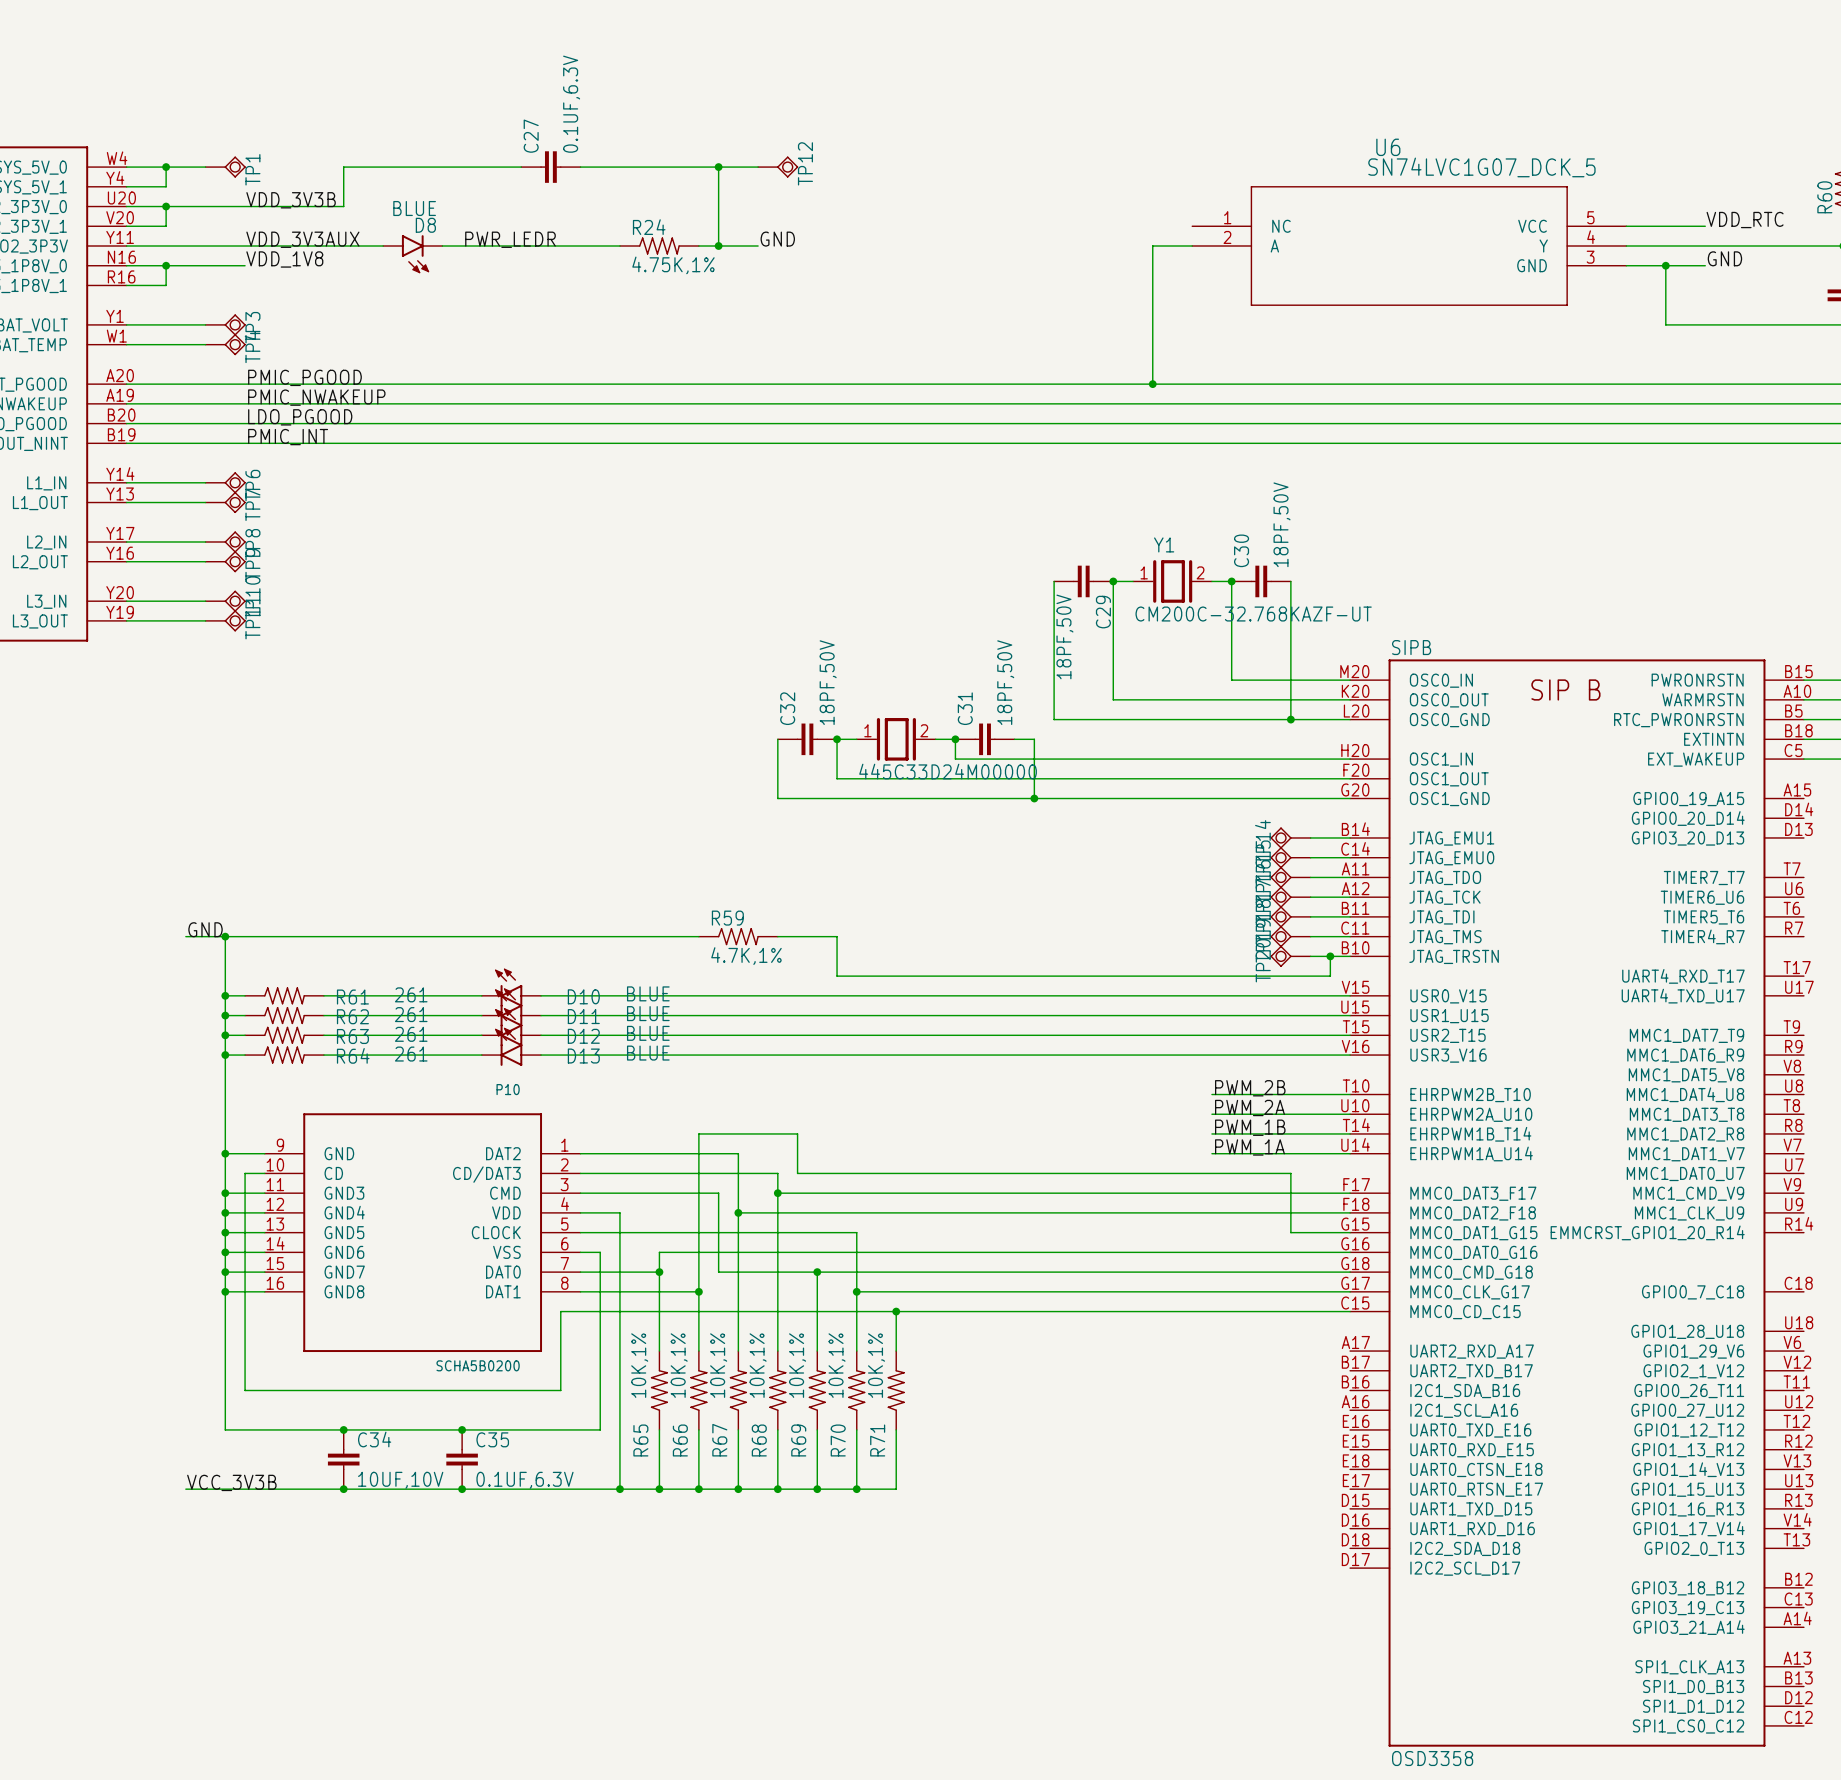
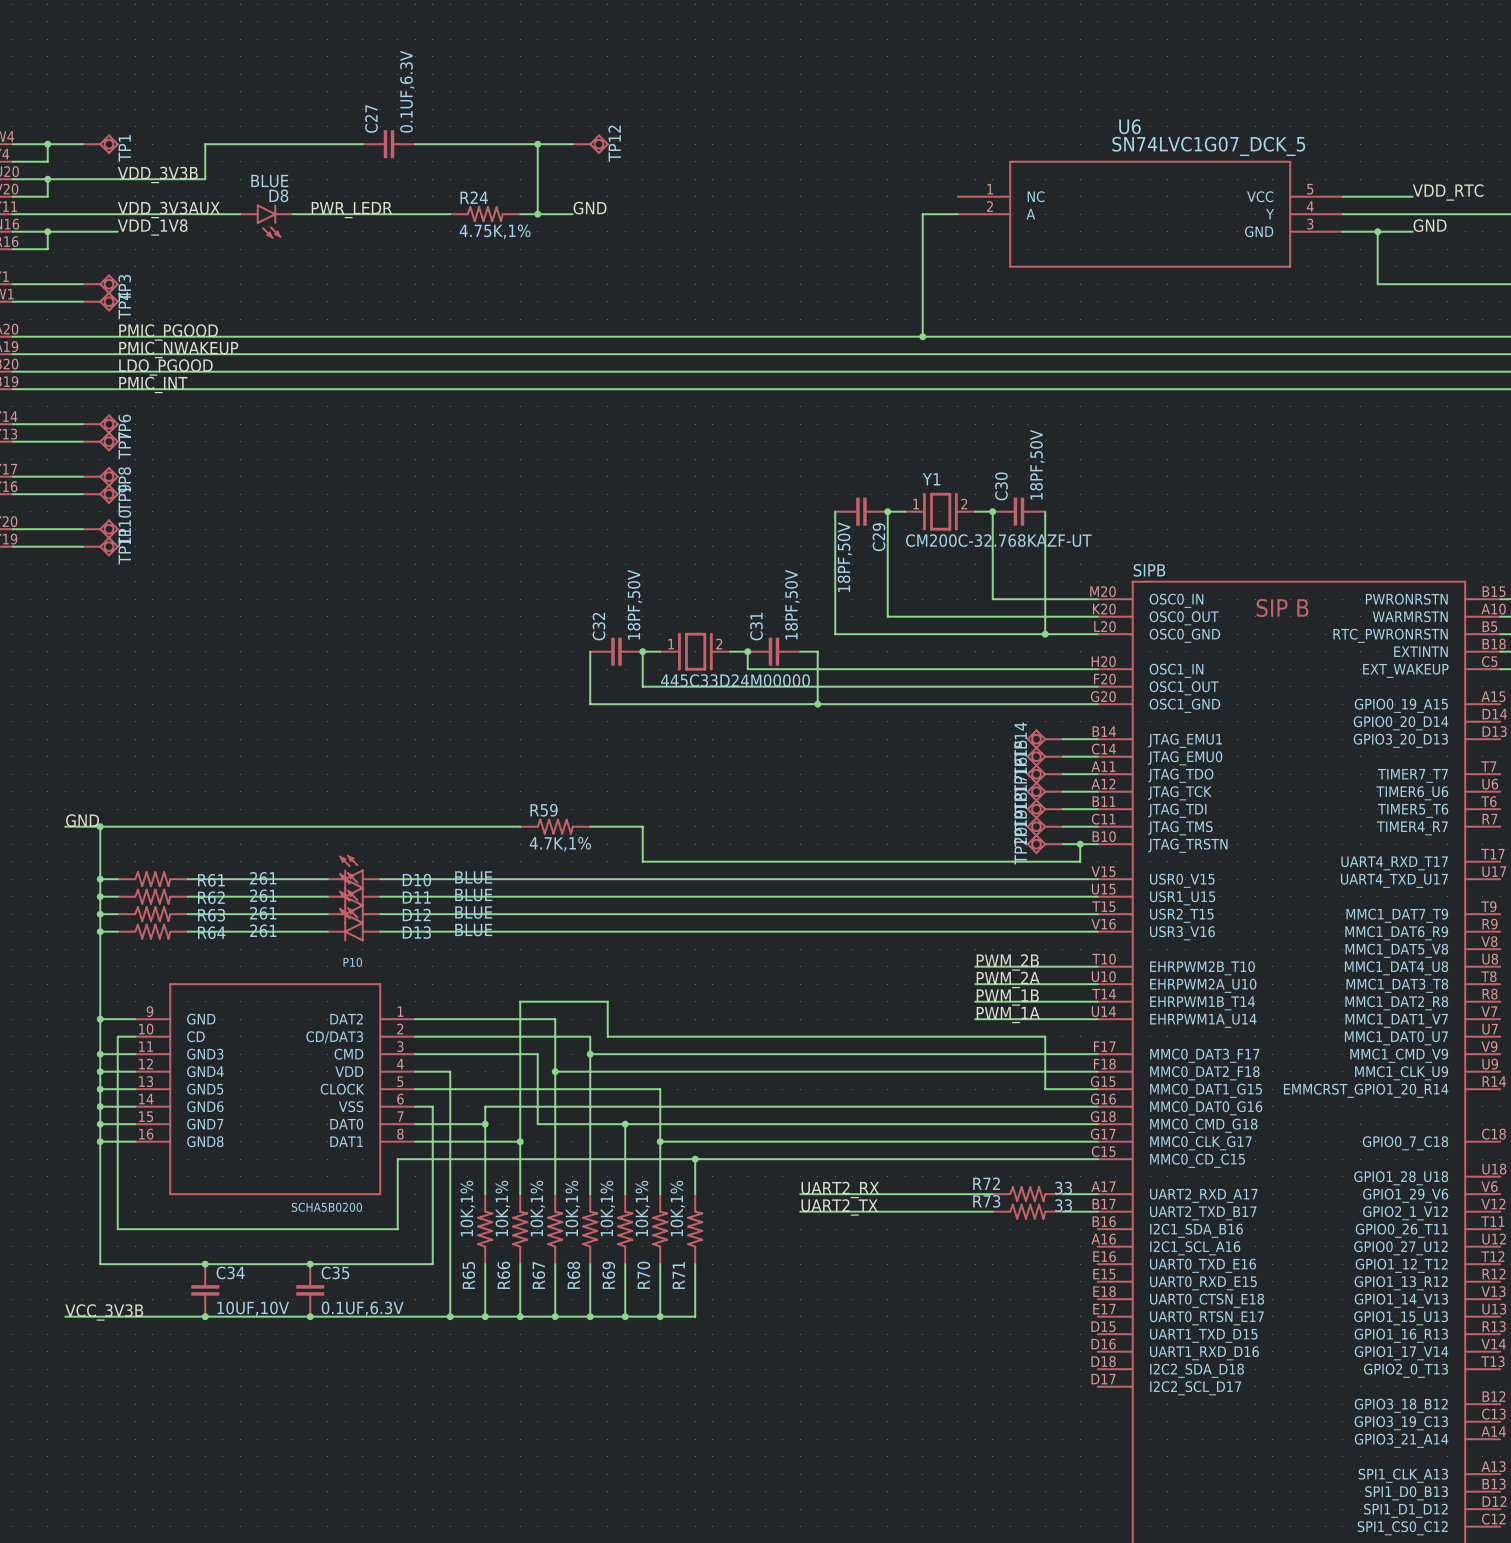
label: none -> UART2_RX (840, 1189)
wire: none -> (800, 1194) (992, 1194)
R72: none -> 33 (1027, 1194)
wire: none -> (1062, 1194) (1097, 1194)
label: none -> UART2_TX (839, 1207)
wire: none -> (800, 1211) (992, 1211)
R73: none -> 33 (1027, 1211)
wire: none -> (1062, 1211) (1097, 1211)

